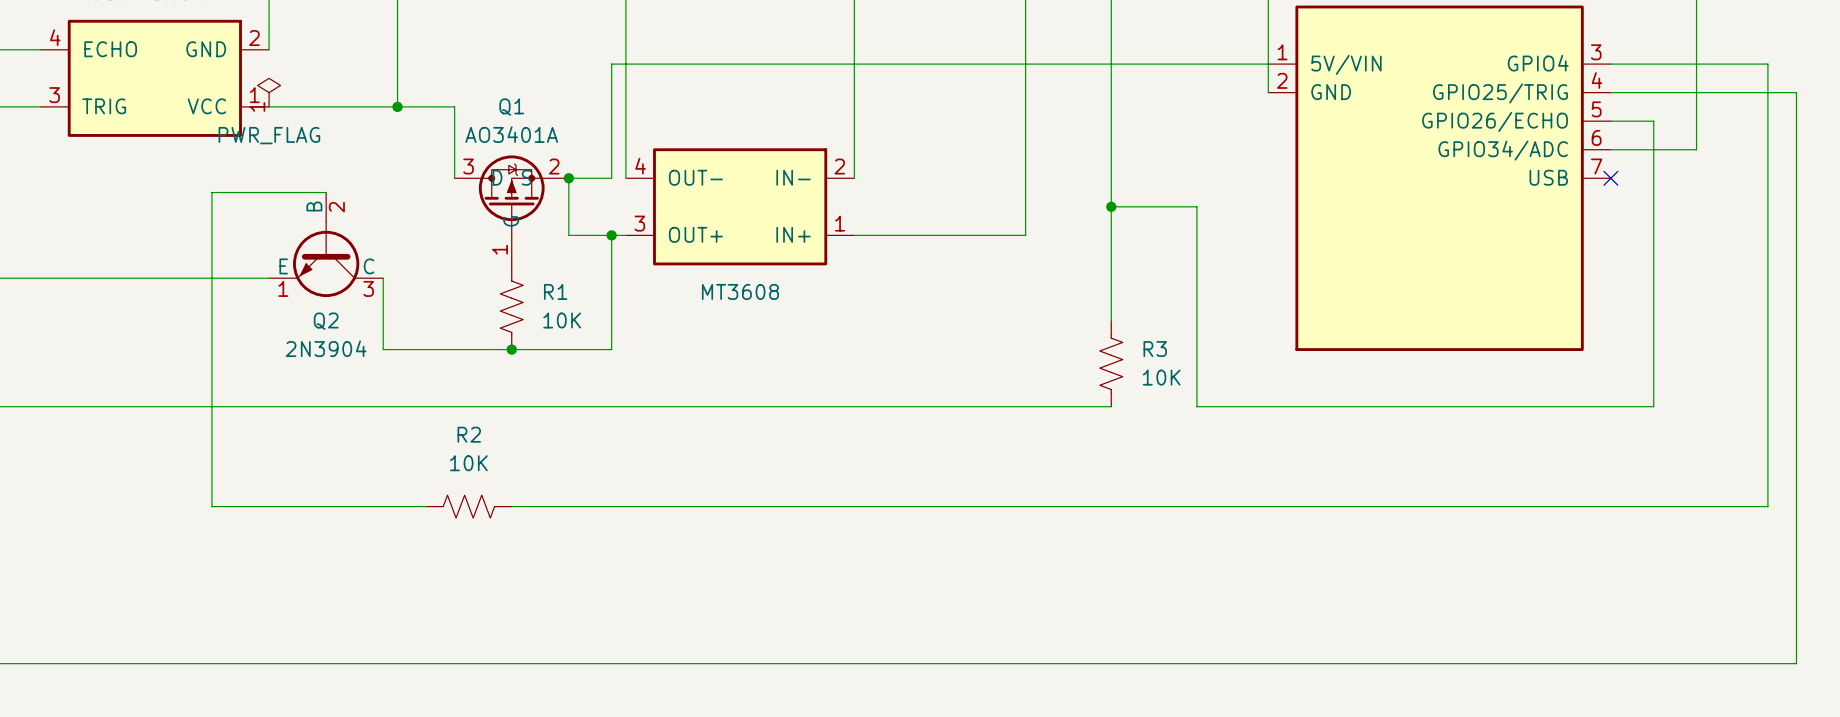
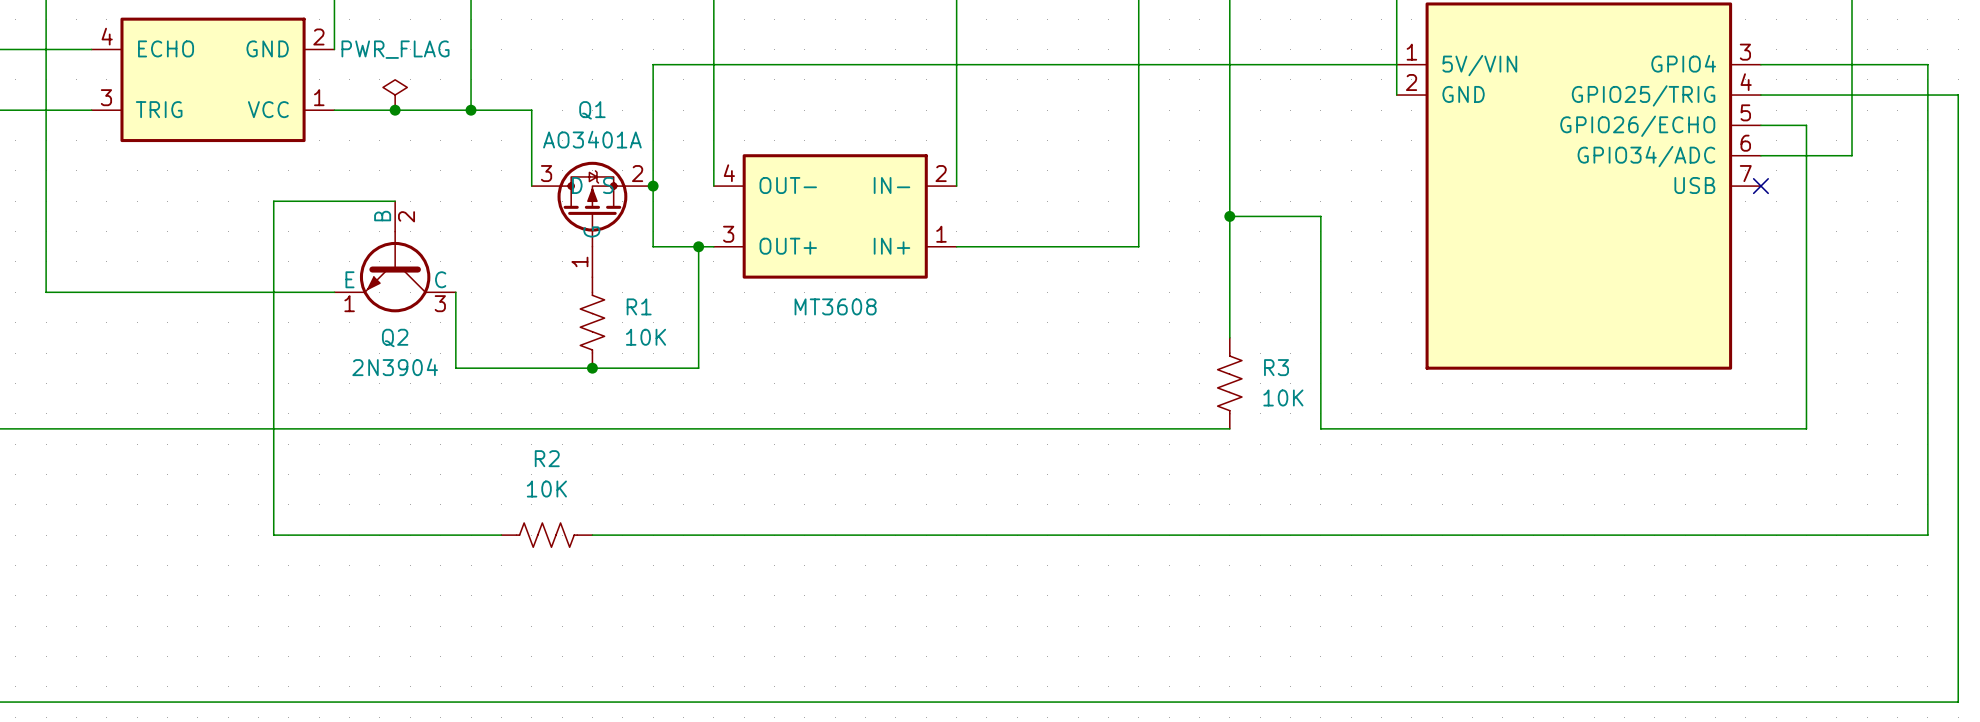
wire: (611, 64) (611, 178) (568, 178) -> (698, 64) (653, 64) (653, 186)
power symbol: PWR_FLAG (269, 92) -> none
power symbol: none -> PWR_FLAG (395, 95)
junction: none -> (395, 110)

